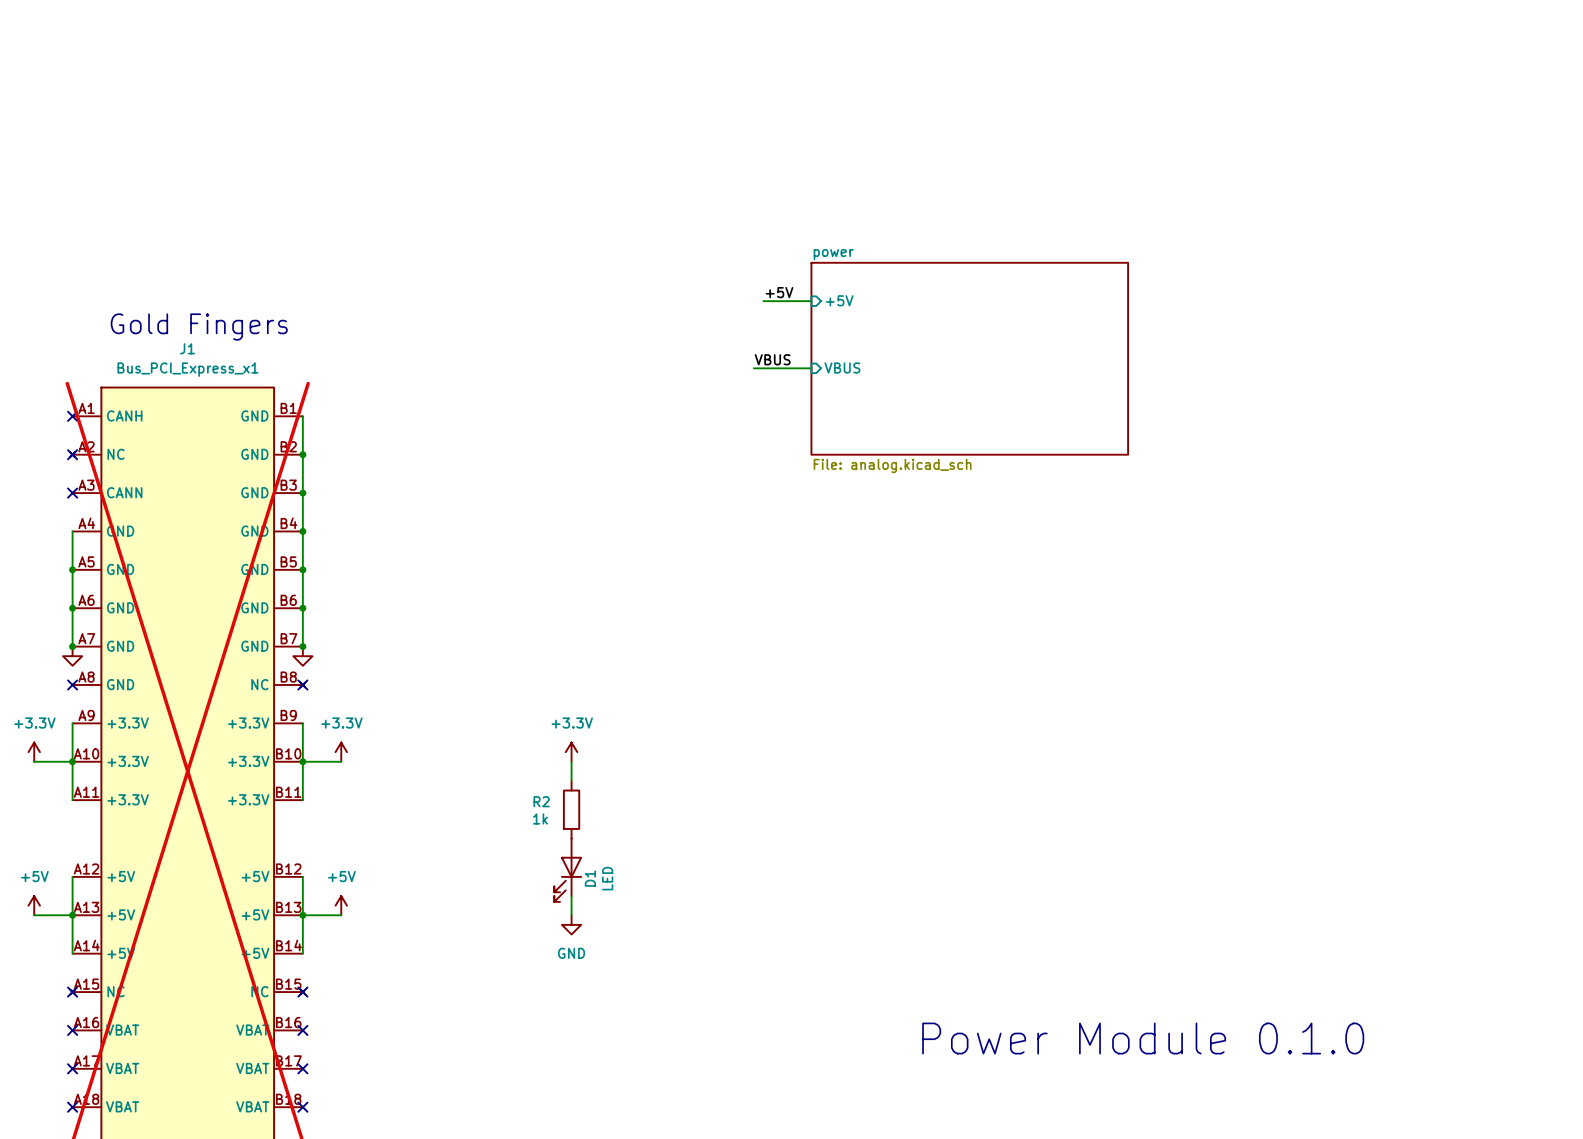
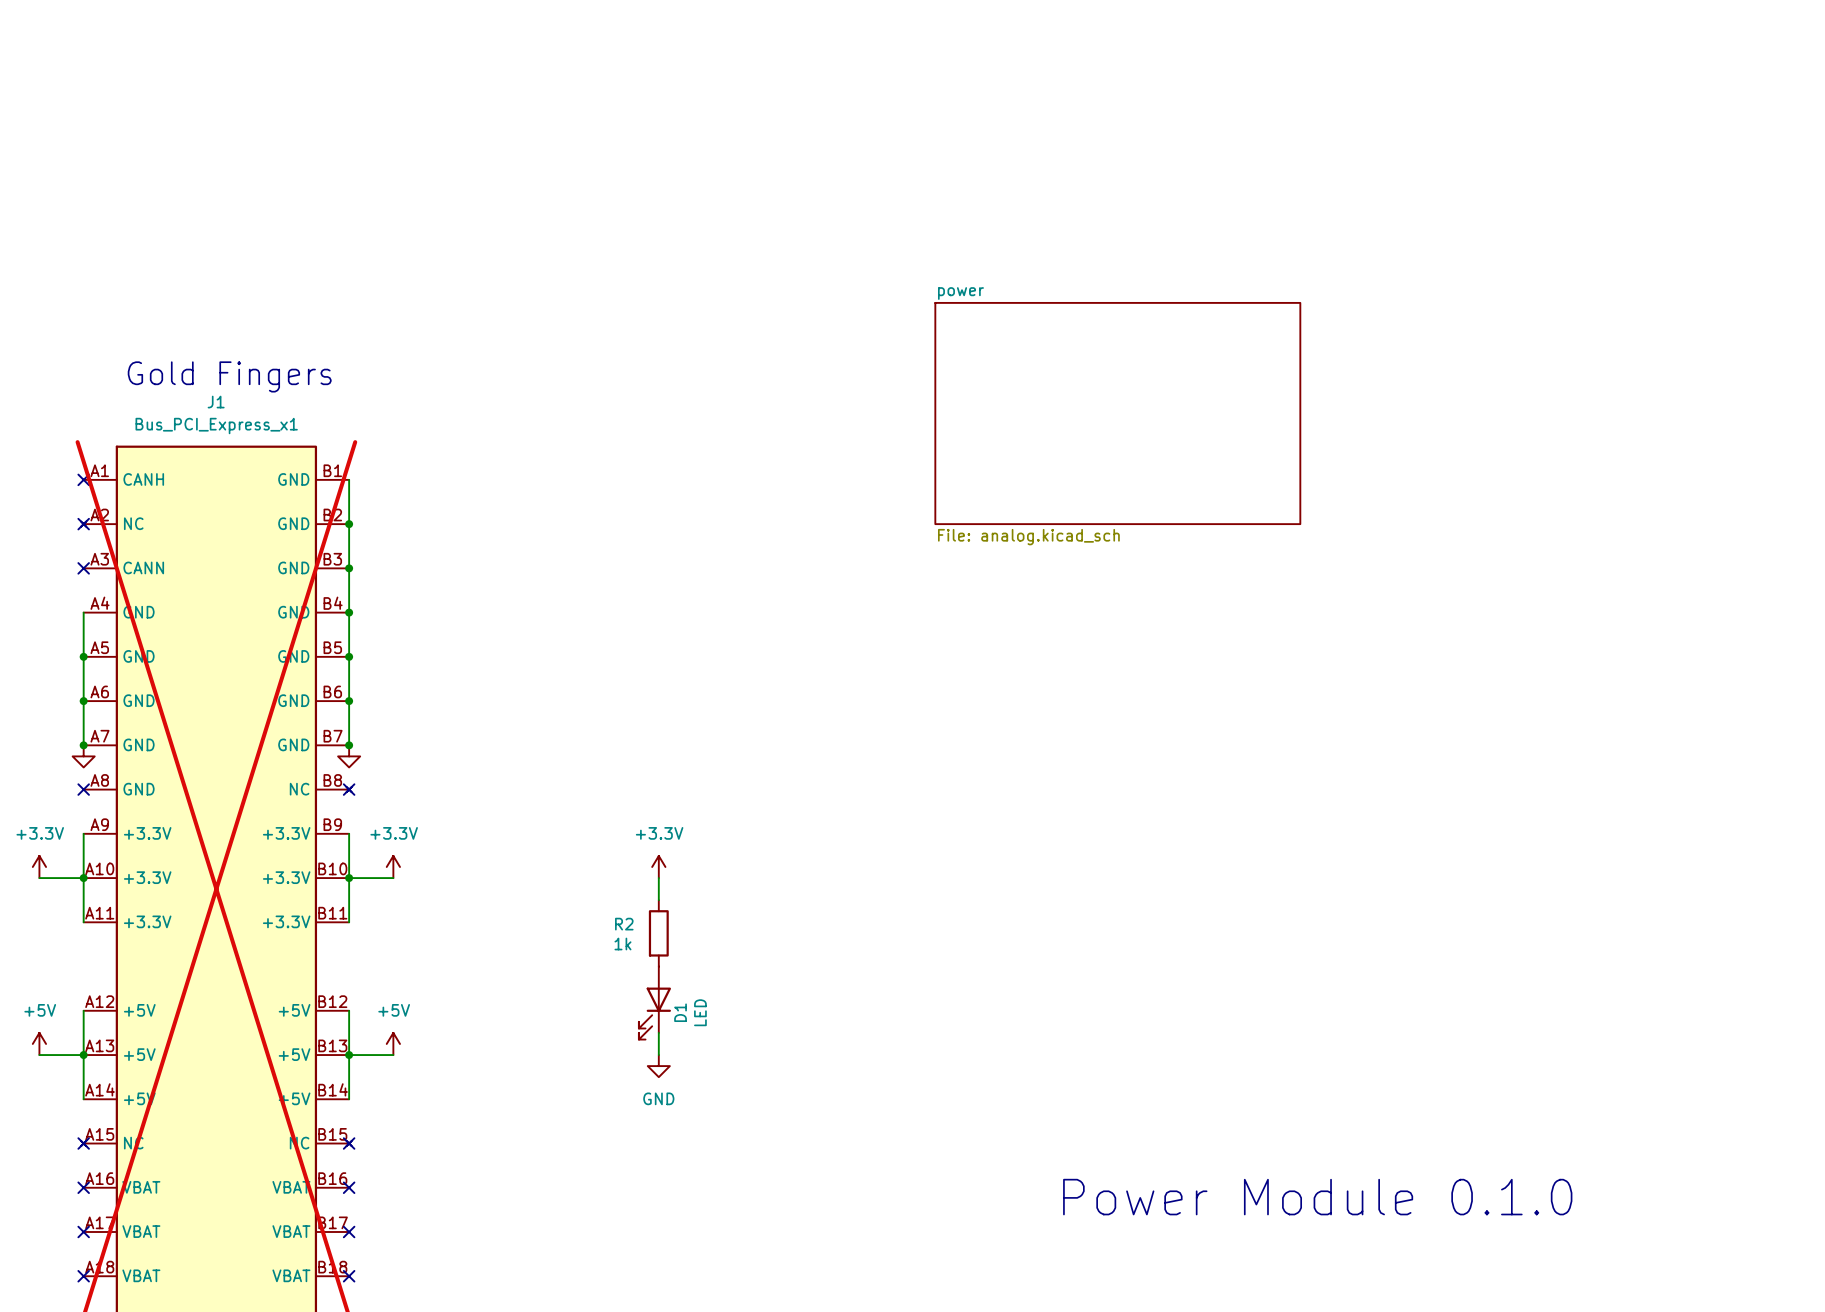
label: +5V (779, 292) -> none
sheet pin: +5V (839, 300) -> none
wire: (763, 301) (811, 301) -> none
label: VBUS (772, 359) -> none
sheet pin: VBUS (842, 367) -> none
wire: (753, 368) (811, 368) -> none

